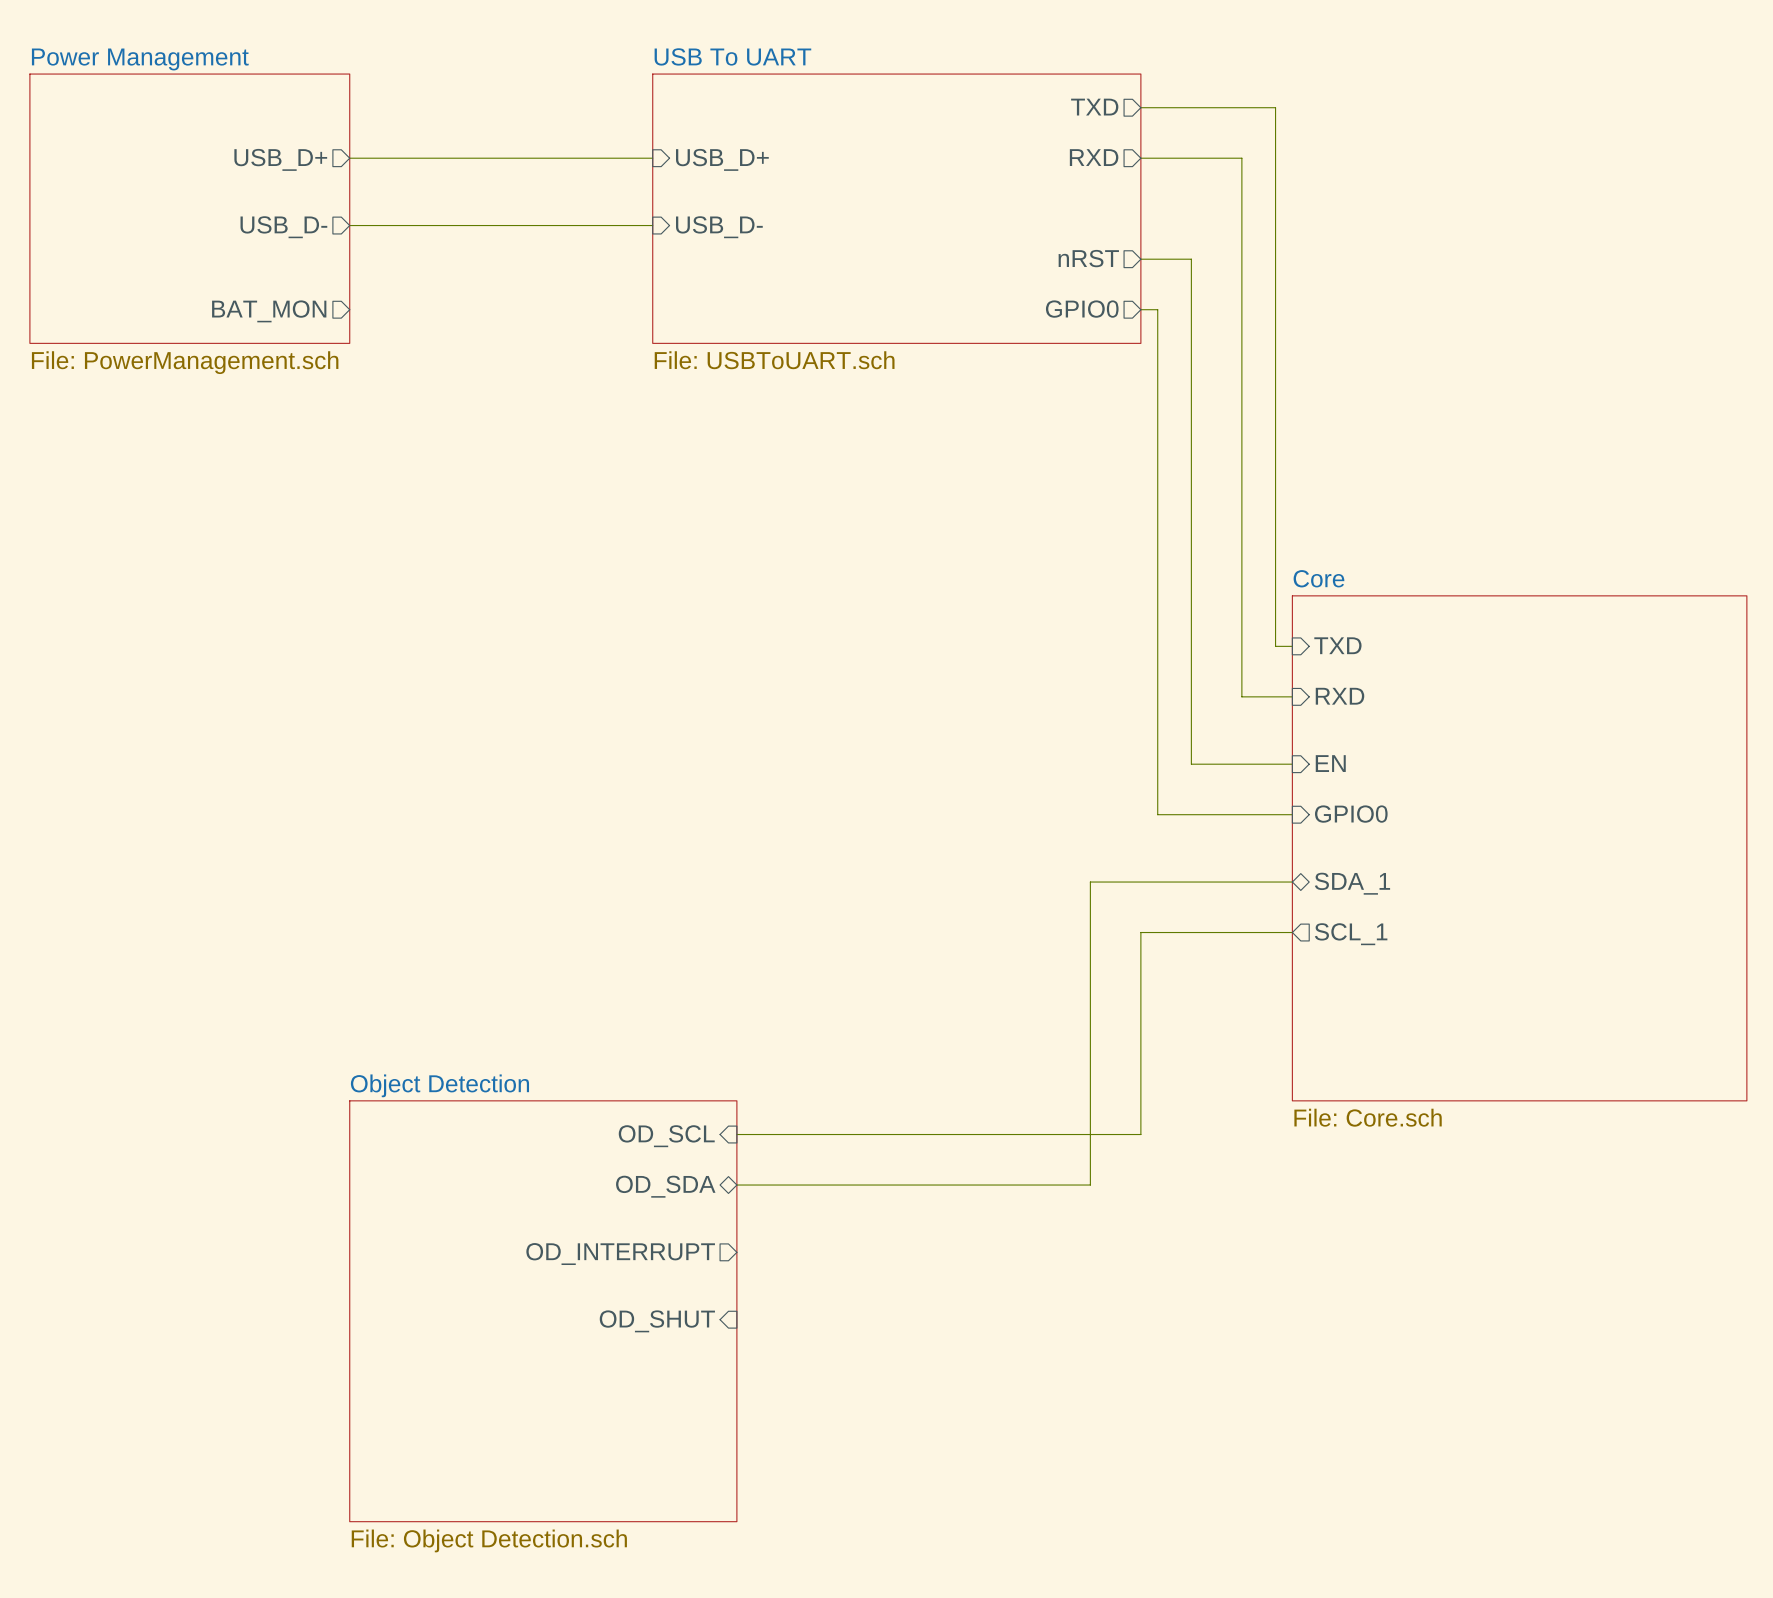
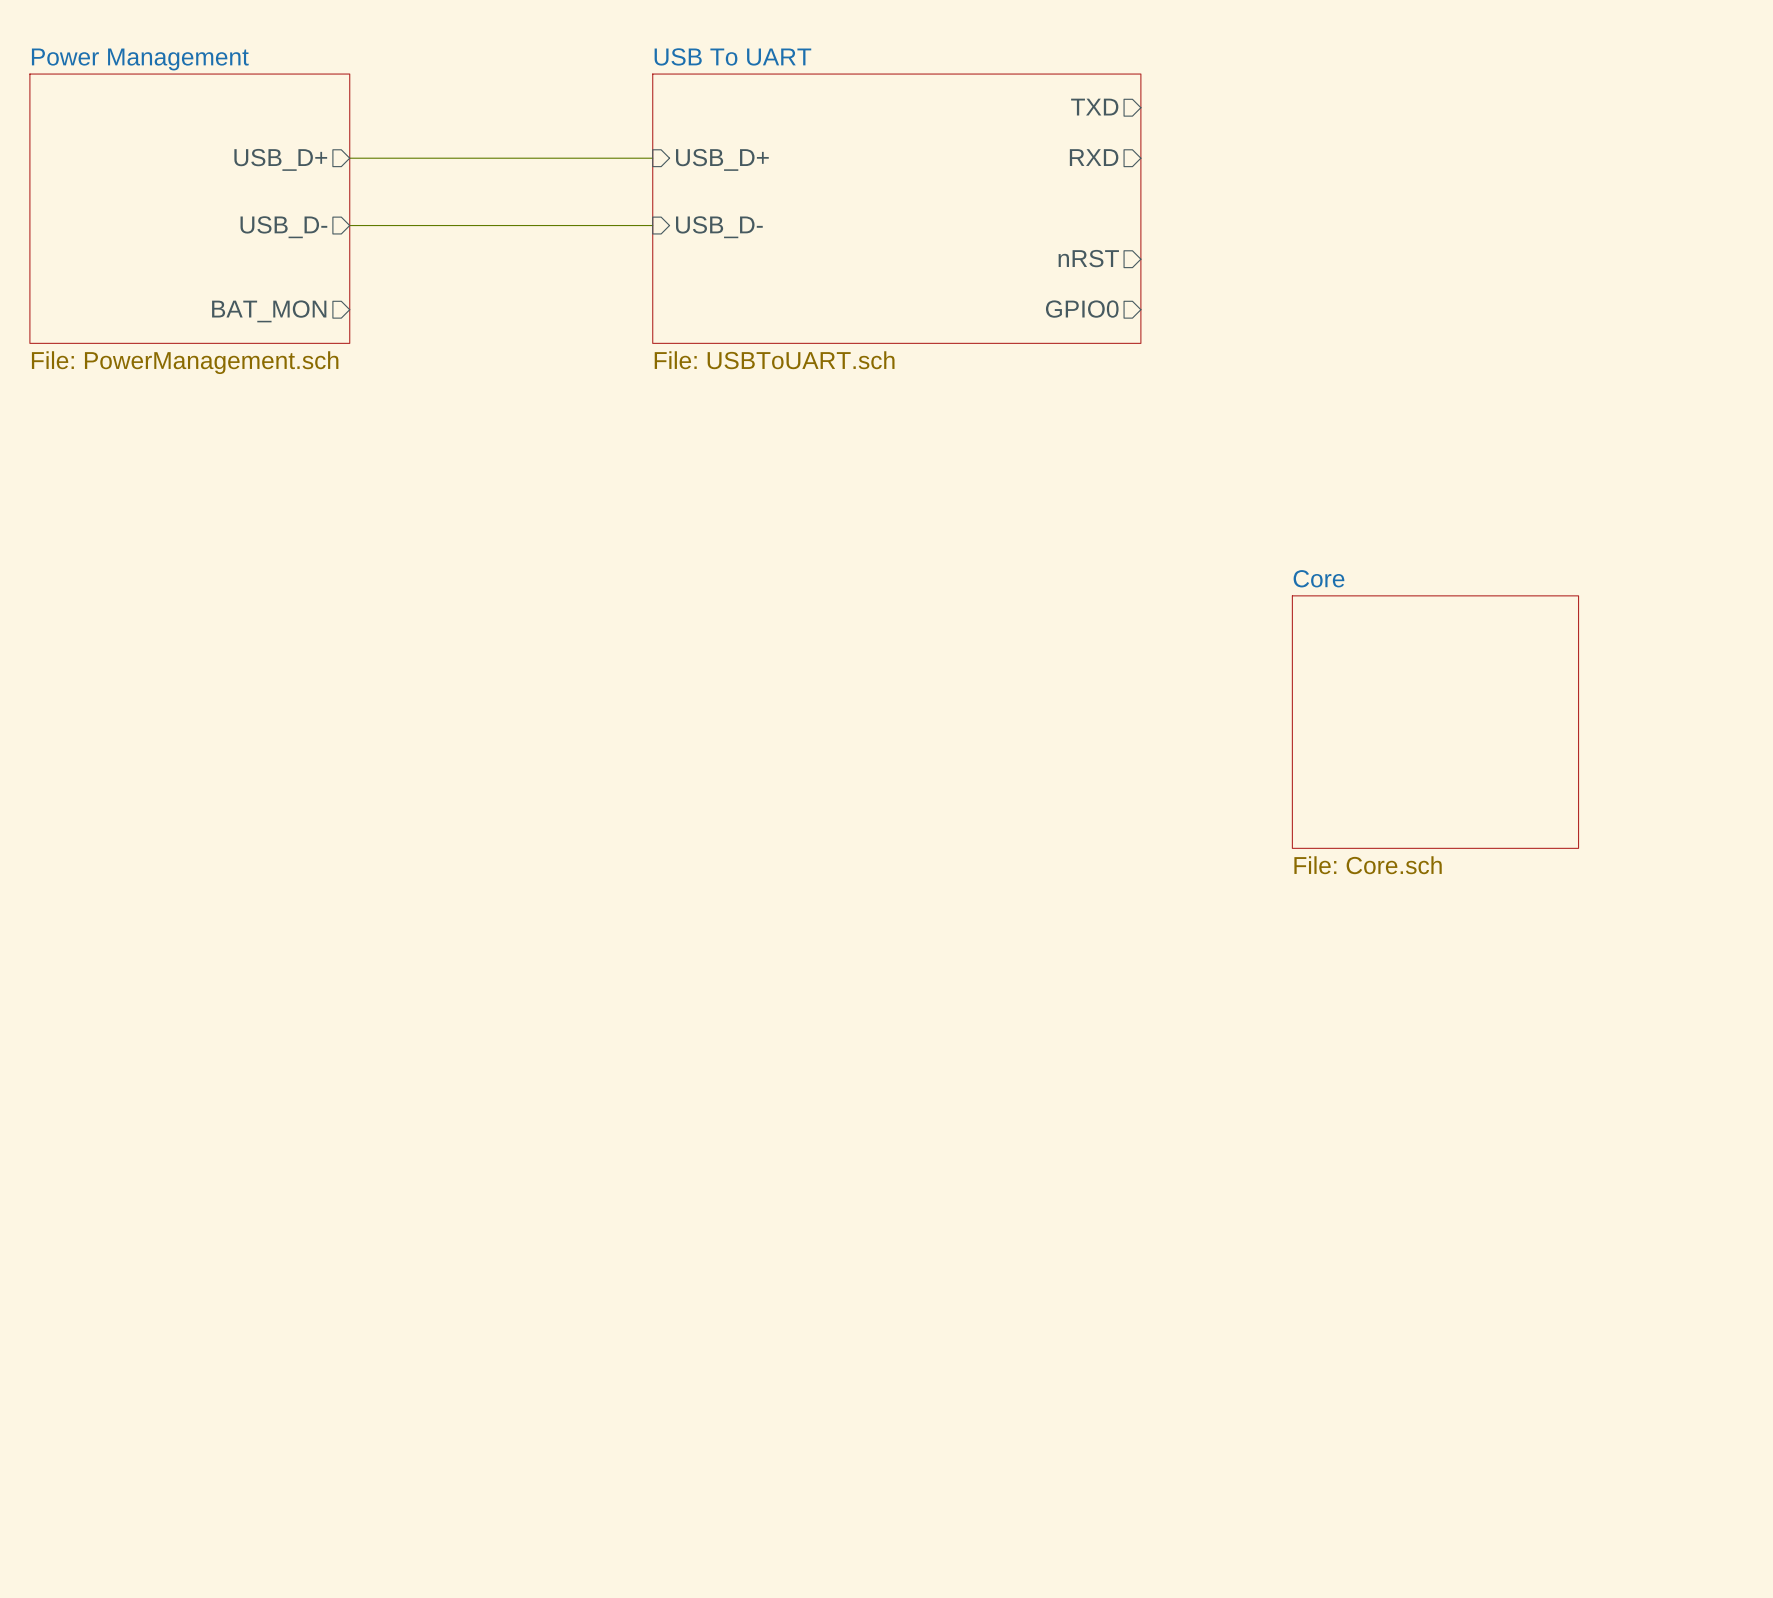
wire: (1140, 107) (1275, 107) (1275, 646) (1292, 646) -> none
wire: (1140, 158) (1241, 158) (1241, 696) (1292, 696) -> none
wire: (1140, 259) (1191, 259) (1191, 764) (1292, 764) -> none
wire: (1140, 309) (1157, 309) (1157, 814) (1292, 814) -> none
sheet pin: TXD (1337, 645) -> none
sheet pin: RXD (1340, 696) -> none
sheet Core: none -> File: Core.sch (1435, 722)
sheet pin: EN (1330, 763) -> none
sheet pin: GPIO0 (1351, 814) -> none
sheet Core: File: Core.sch (1519, 848) -> none
wire: (1292, 882) (1090, 882) (1090, 1185) (736, 1185) -> none
sheet pin: SDA_1 (1352, 883) -> none
wire: (1292, 932) (1140, 932) (1140, 1134) (736, 1134) -> none
sheet pin: SCL_1 (1351, 934) -> none
sheet pin: OD_SCL (666, 1136) -> none
sheet pin: OD_SDA (665, 1186) -> none
sheet pin: OD_INTERRUPT (620, 1254) -> none
sheet Object Detection: File: Object Detection.sch (543, 1311) -> none
sheet pin: OD_SHUT (657, 1321) -> none

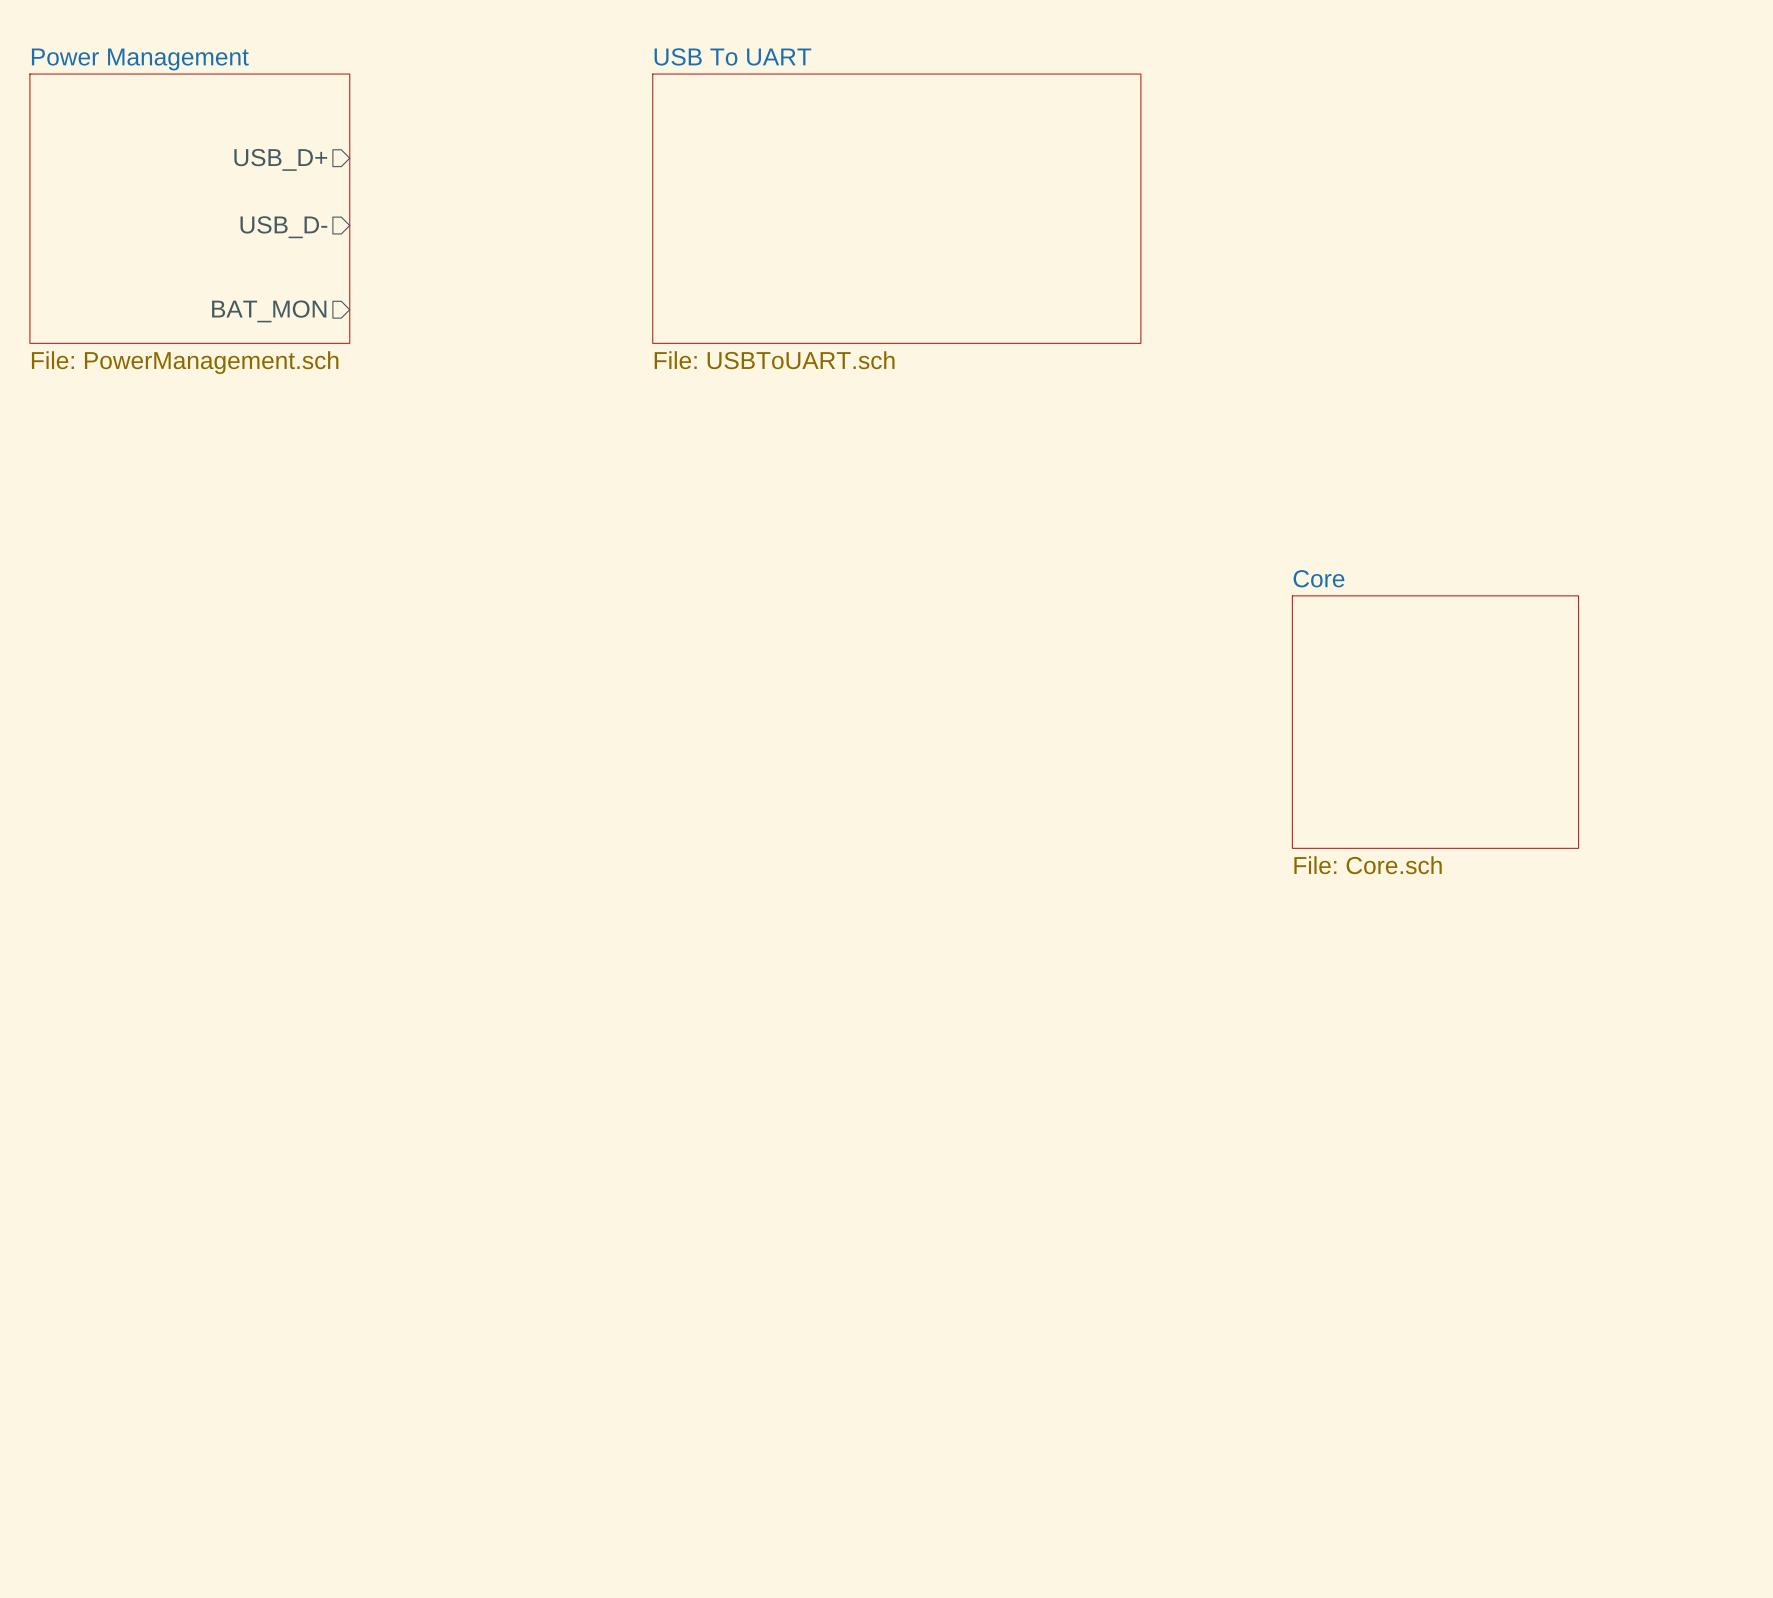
sheet pin: TXD (1094, 107) -> none
sheet pin: RXD (1094, 157) -> none
wire: (349, 158) (652, 158) -> none
sheet pin: USB_D+ (722, 159) -> none
wire: (349, 225) (652, 225) -> none
sheet pin: USB_D- (719, 227) -> none
sheet pin: nRST (1088, 258) -> none
sheet pin: GPIO0 (1082, 309) -> none

